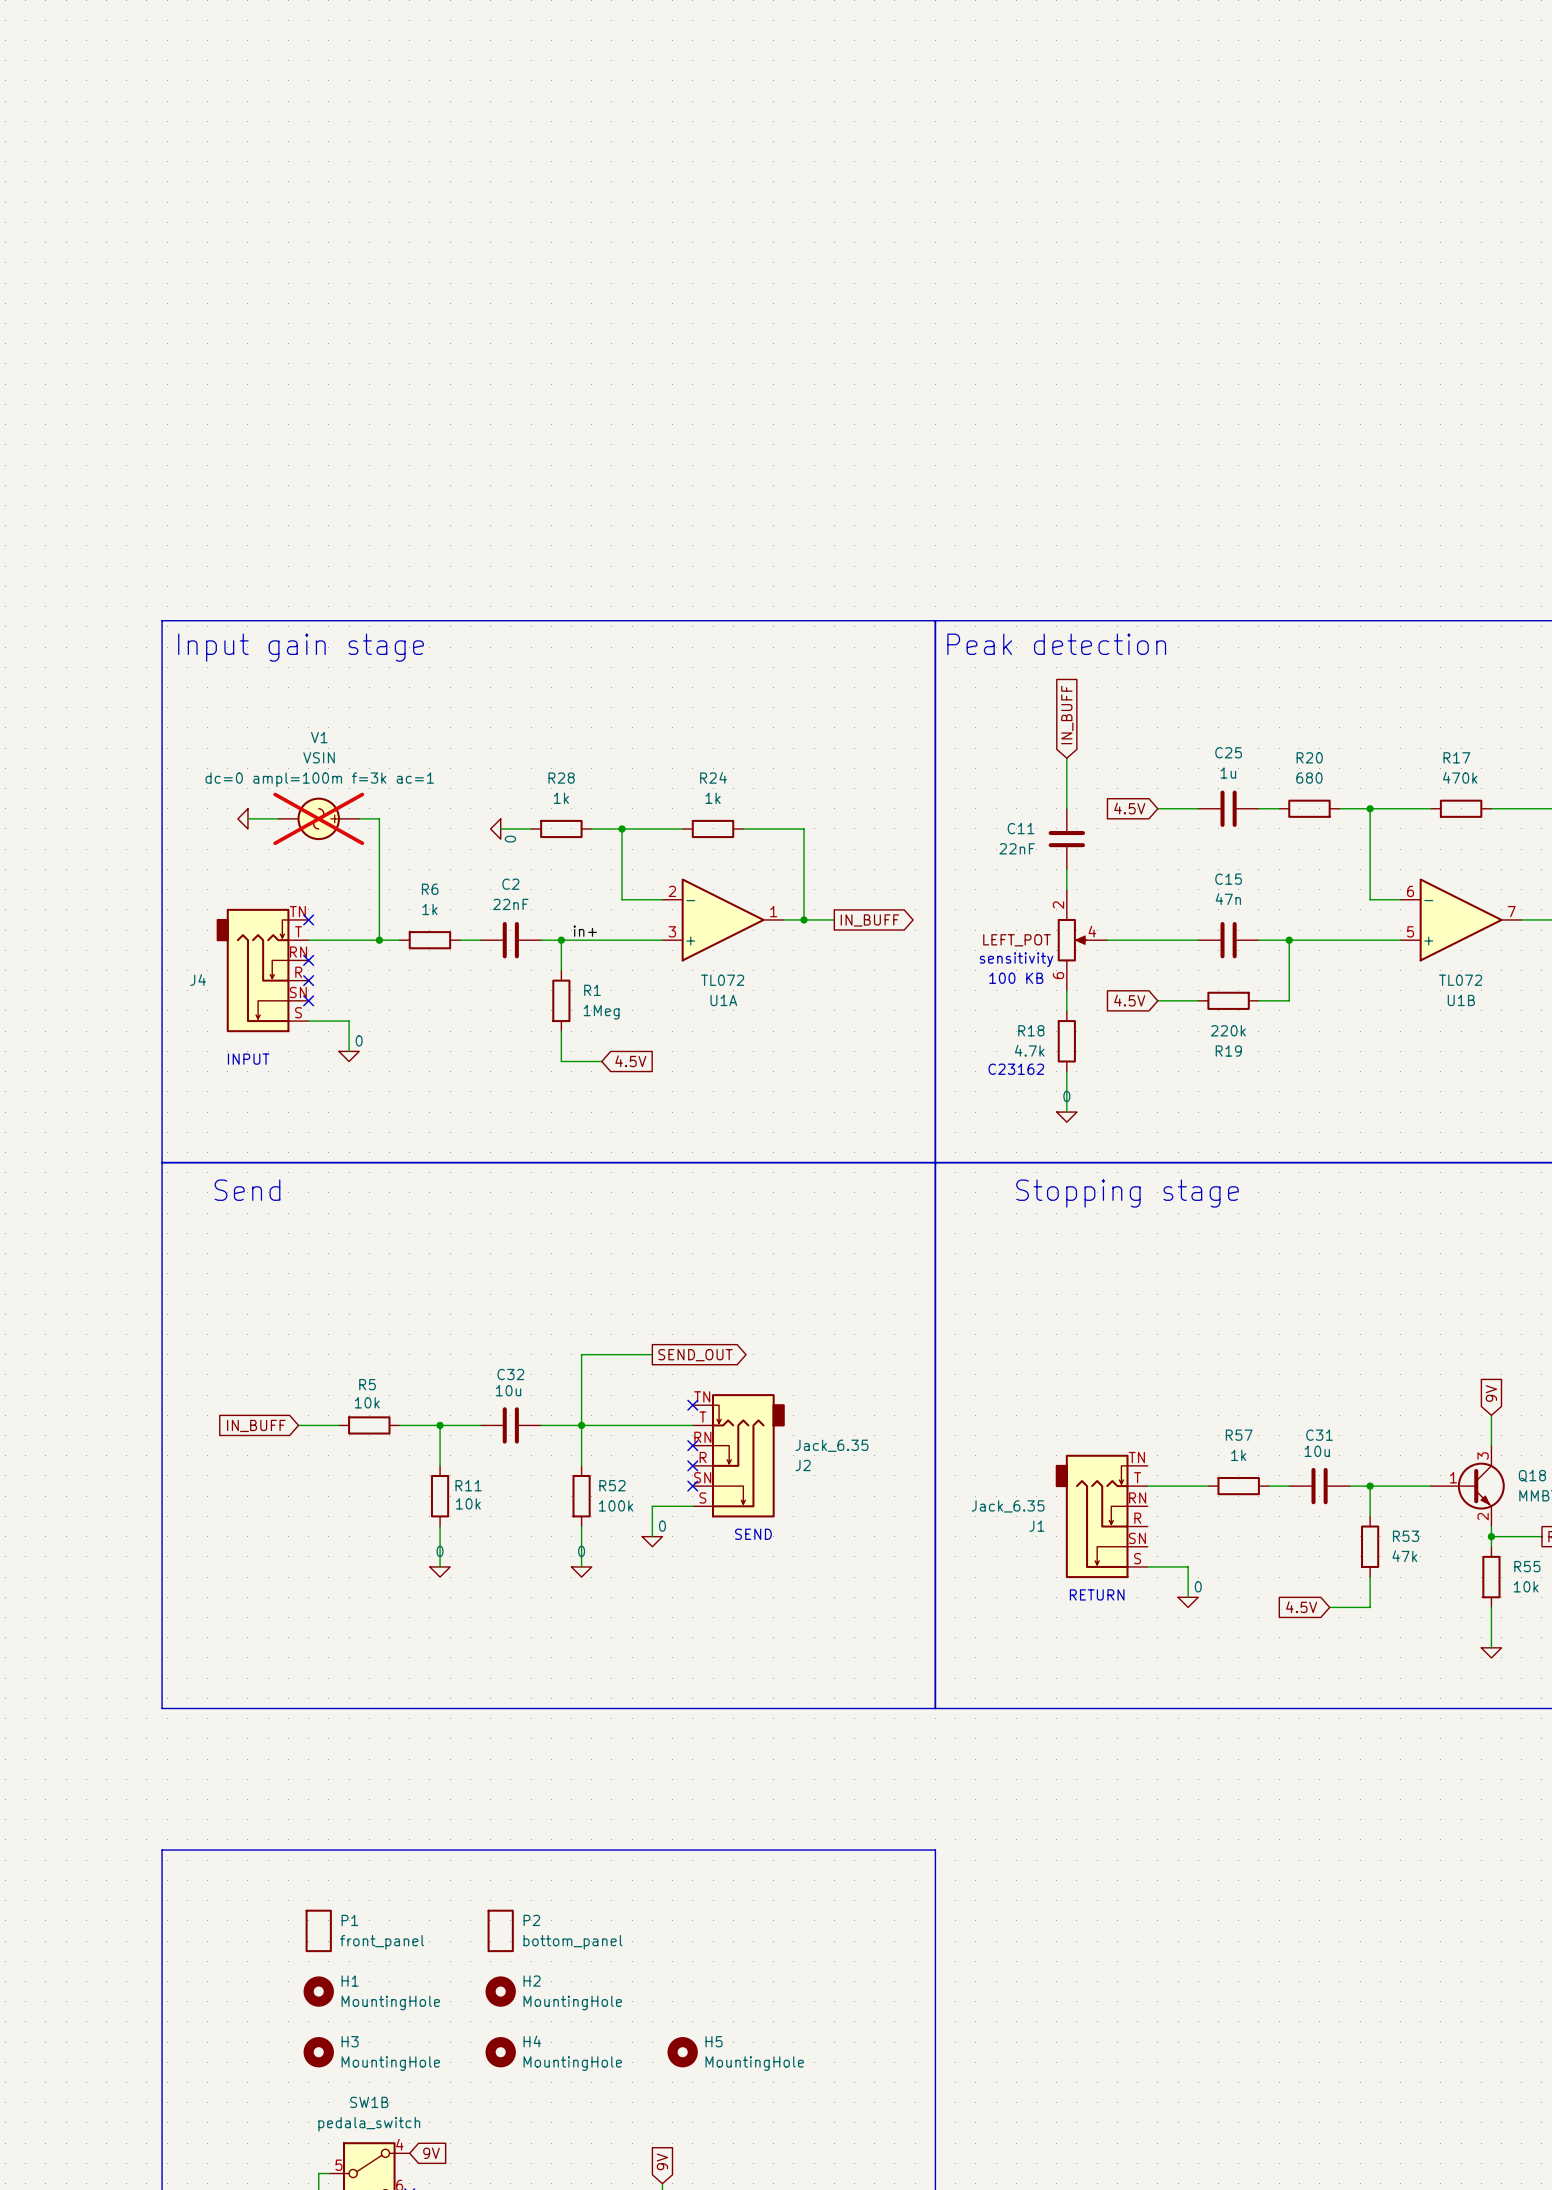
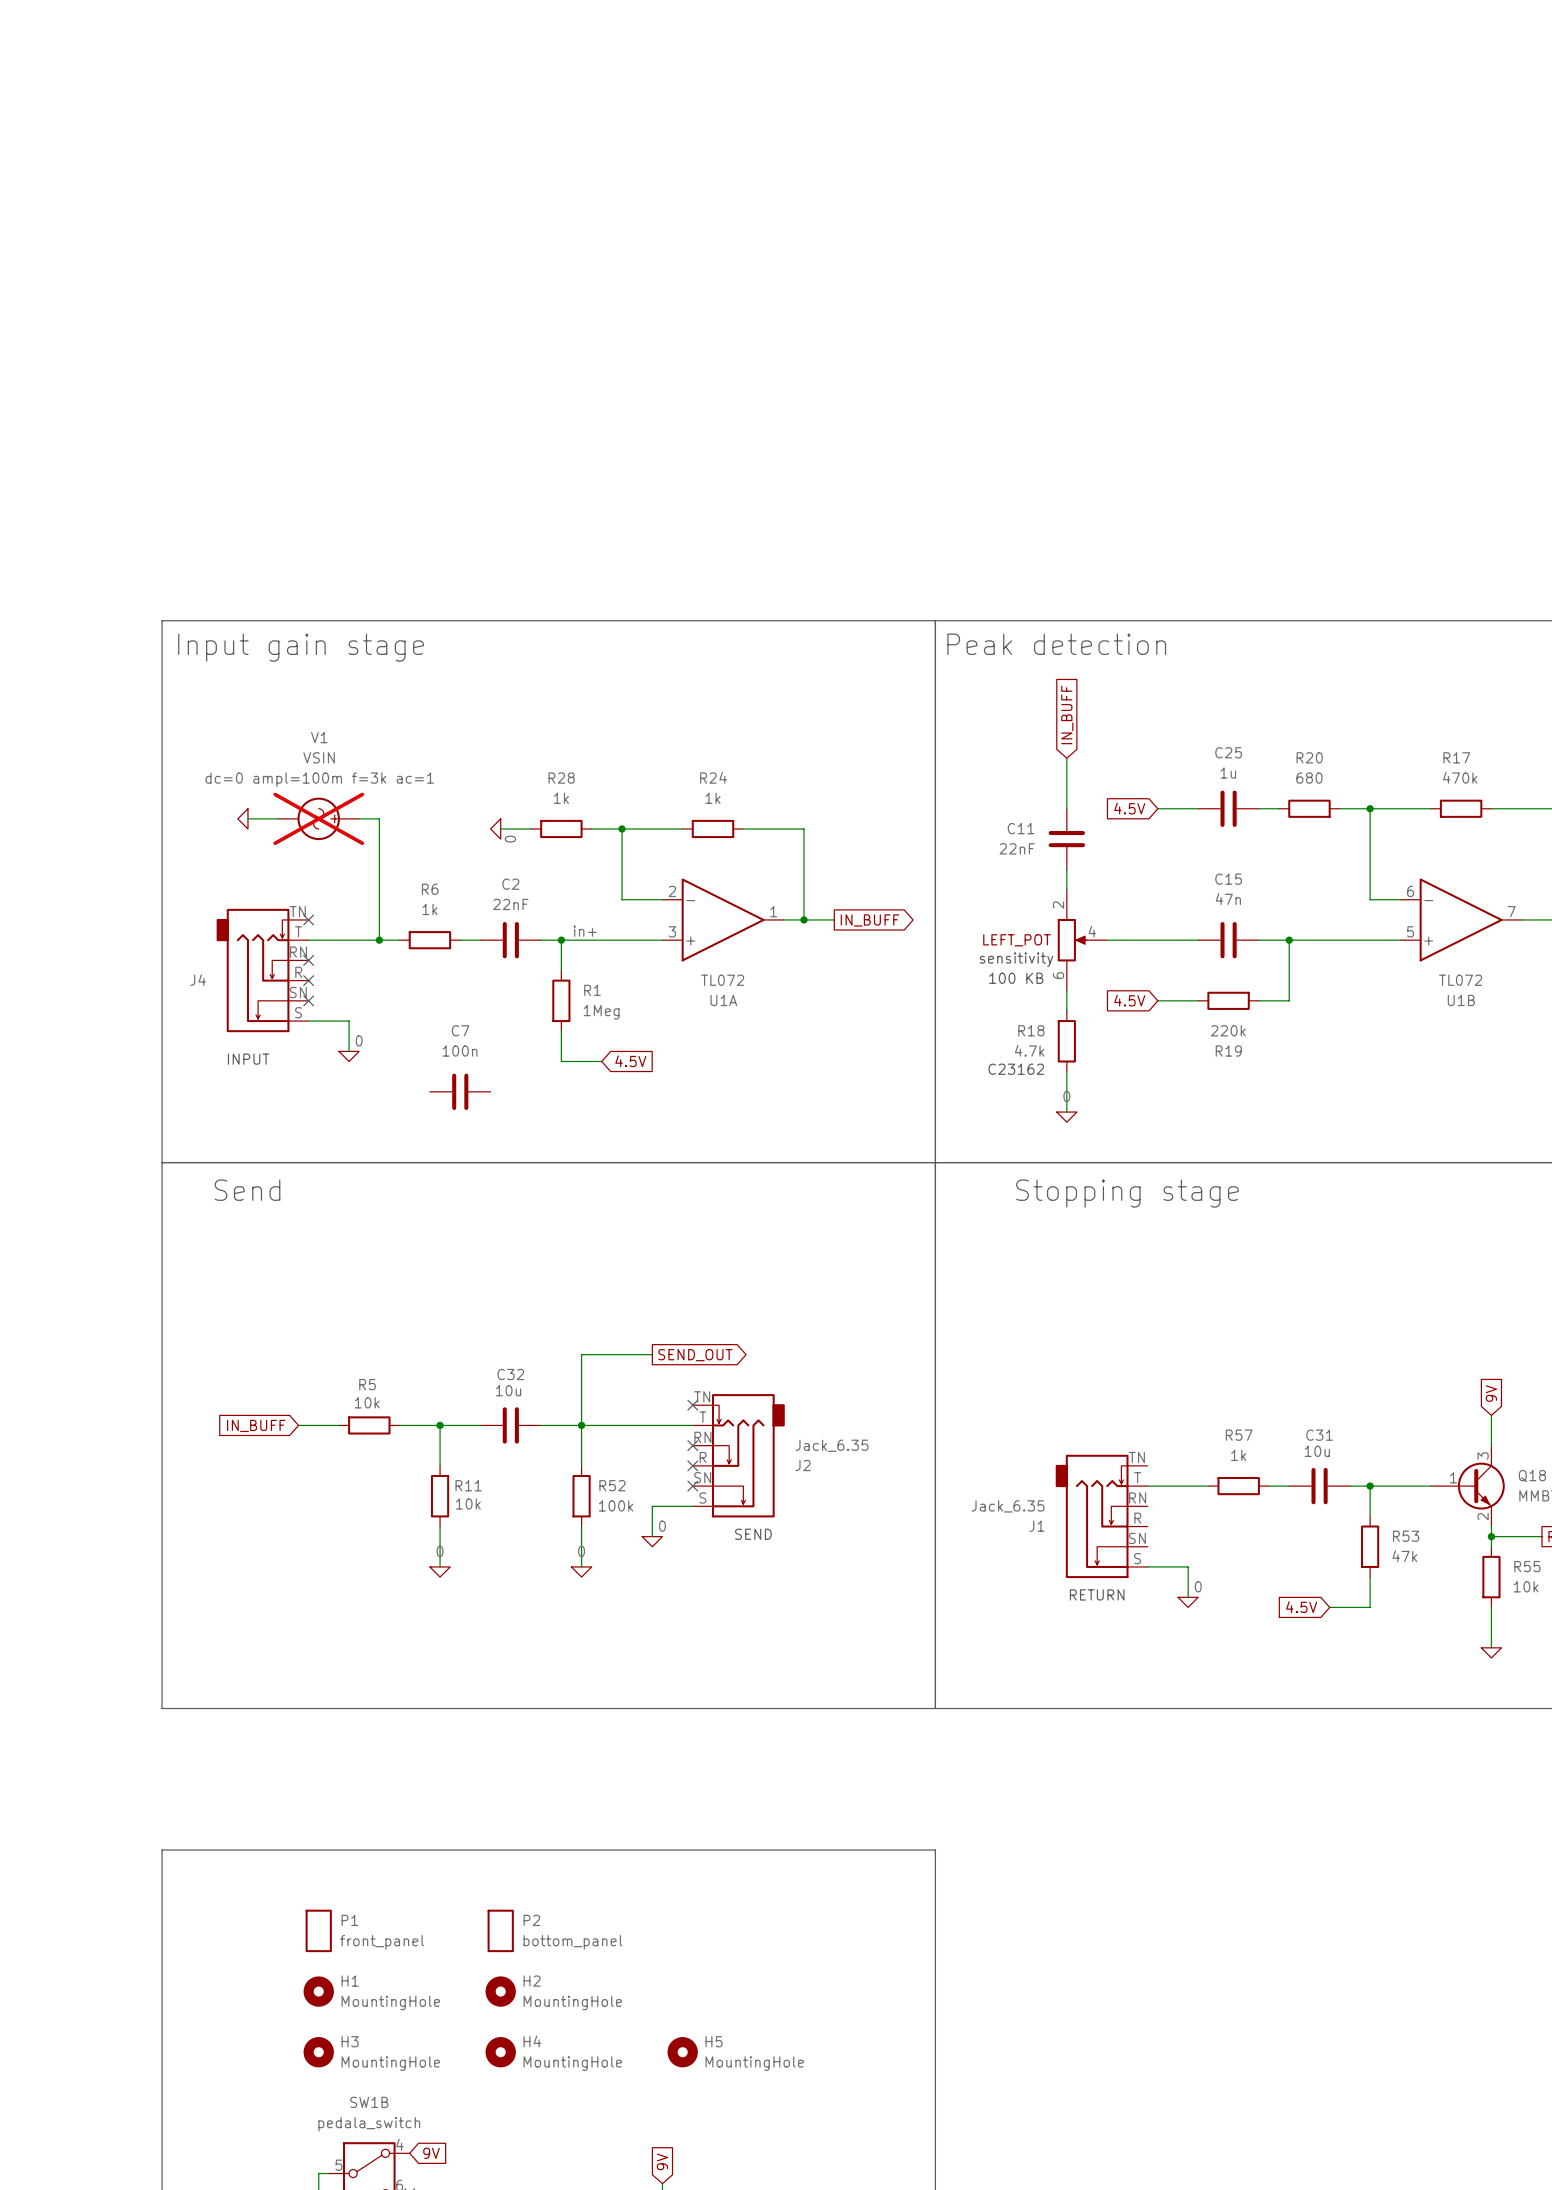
C7: none -> 100n (460, 1091)

